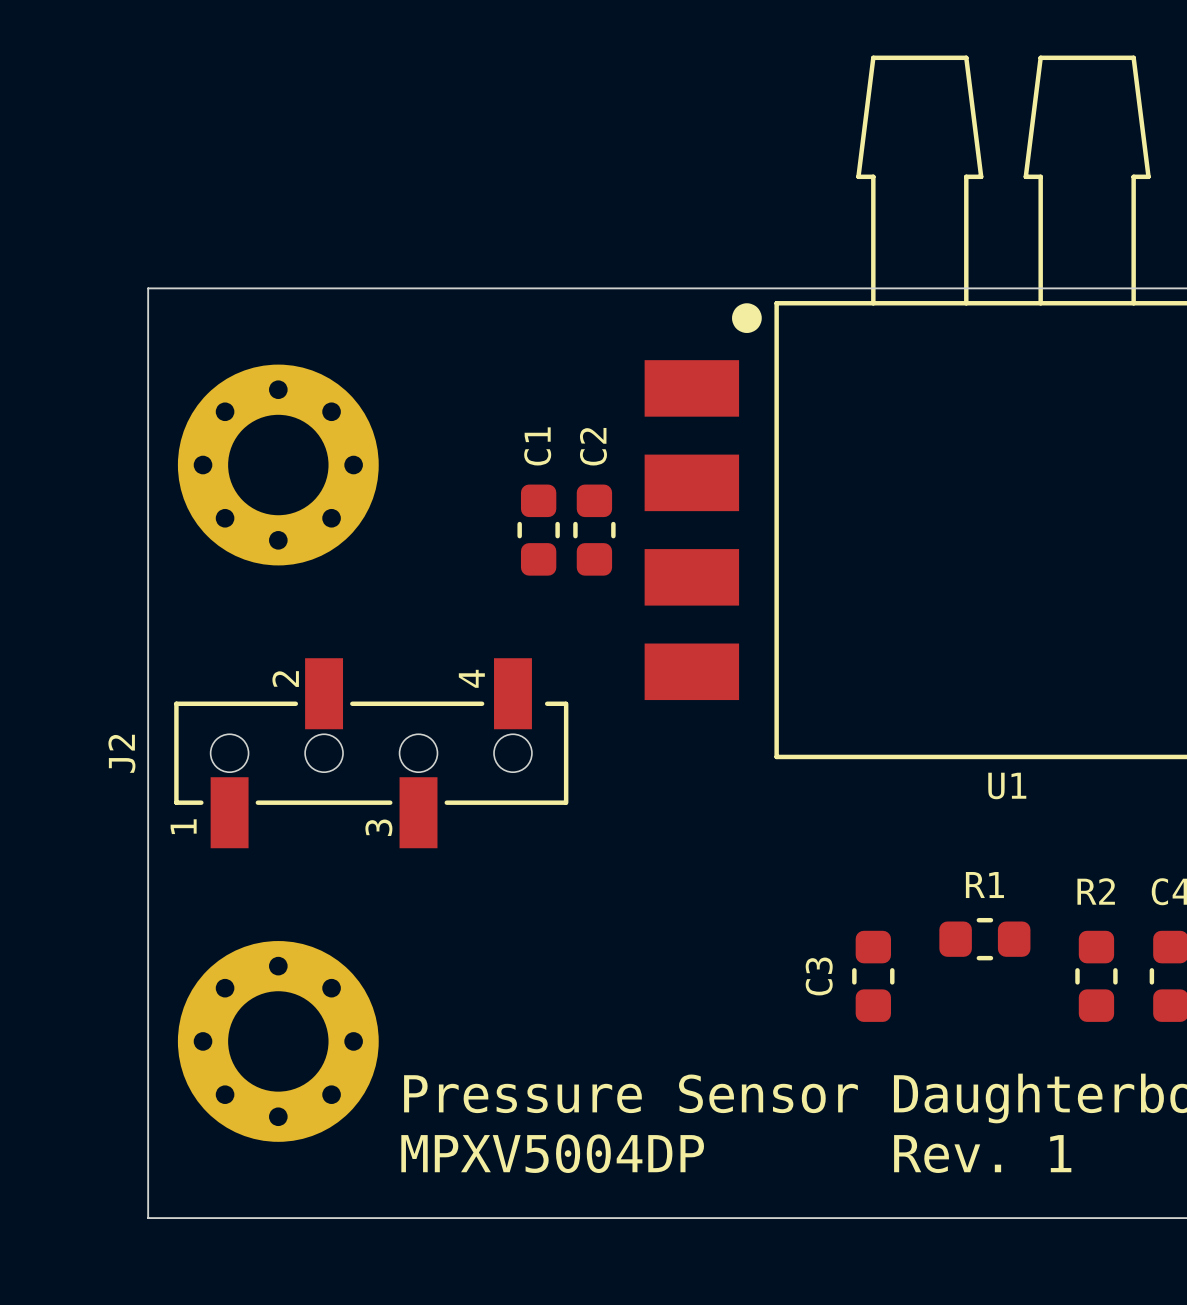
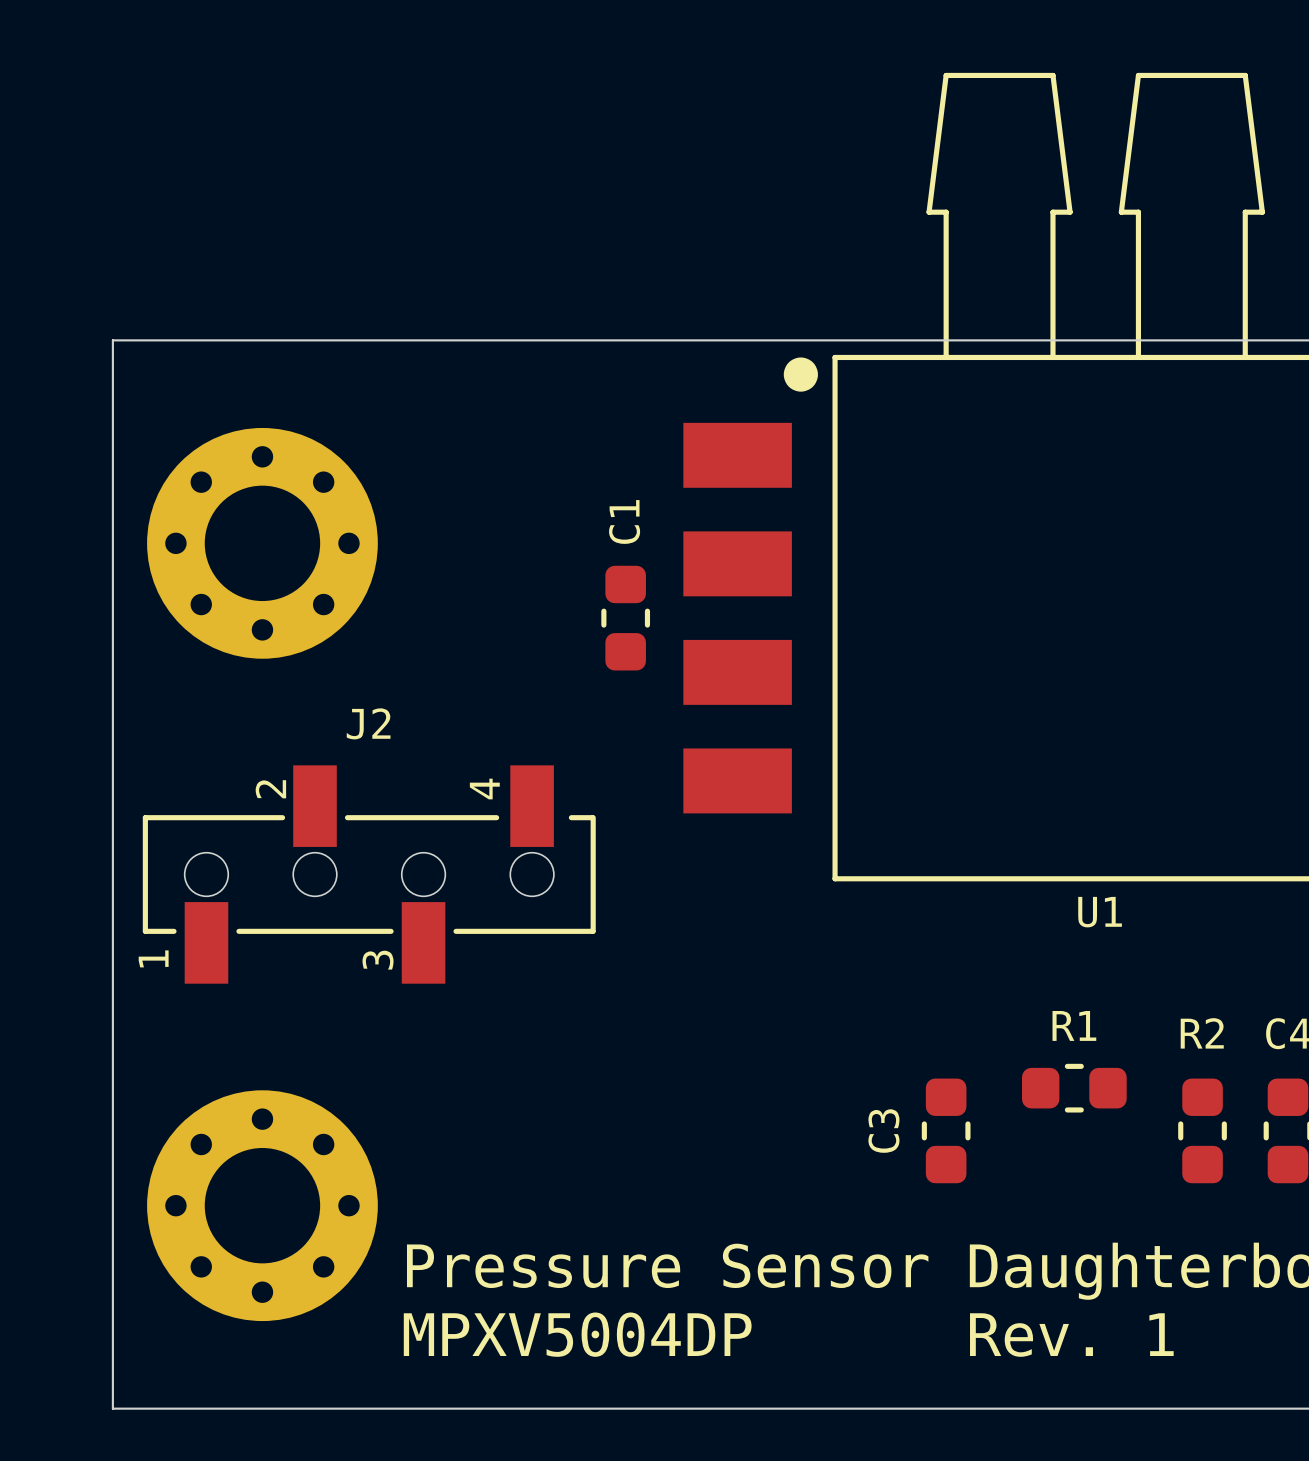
C2 name: C2 (593, 446) -> C1 (624, 521)
C1: (538, 530) -> none
J2 name rotation: 0° (121, 753) -> 90° clockwise (368, 723)
J2 name position: J2 (121, 753) -> J2 (368, 723)

